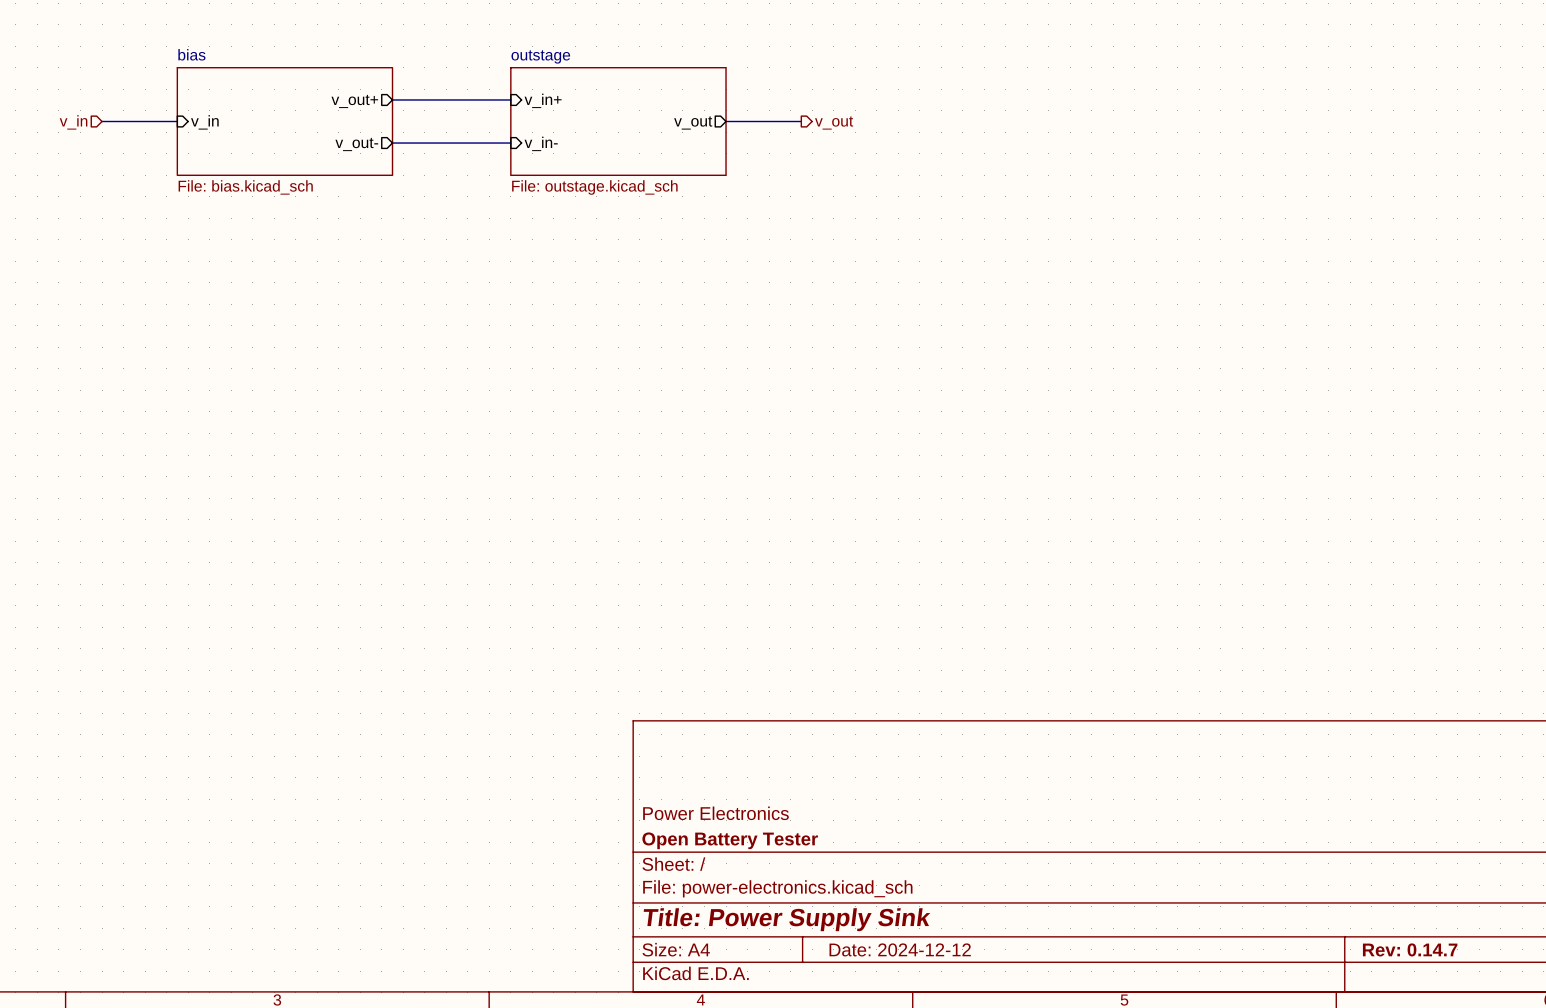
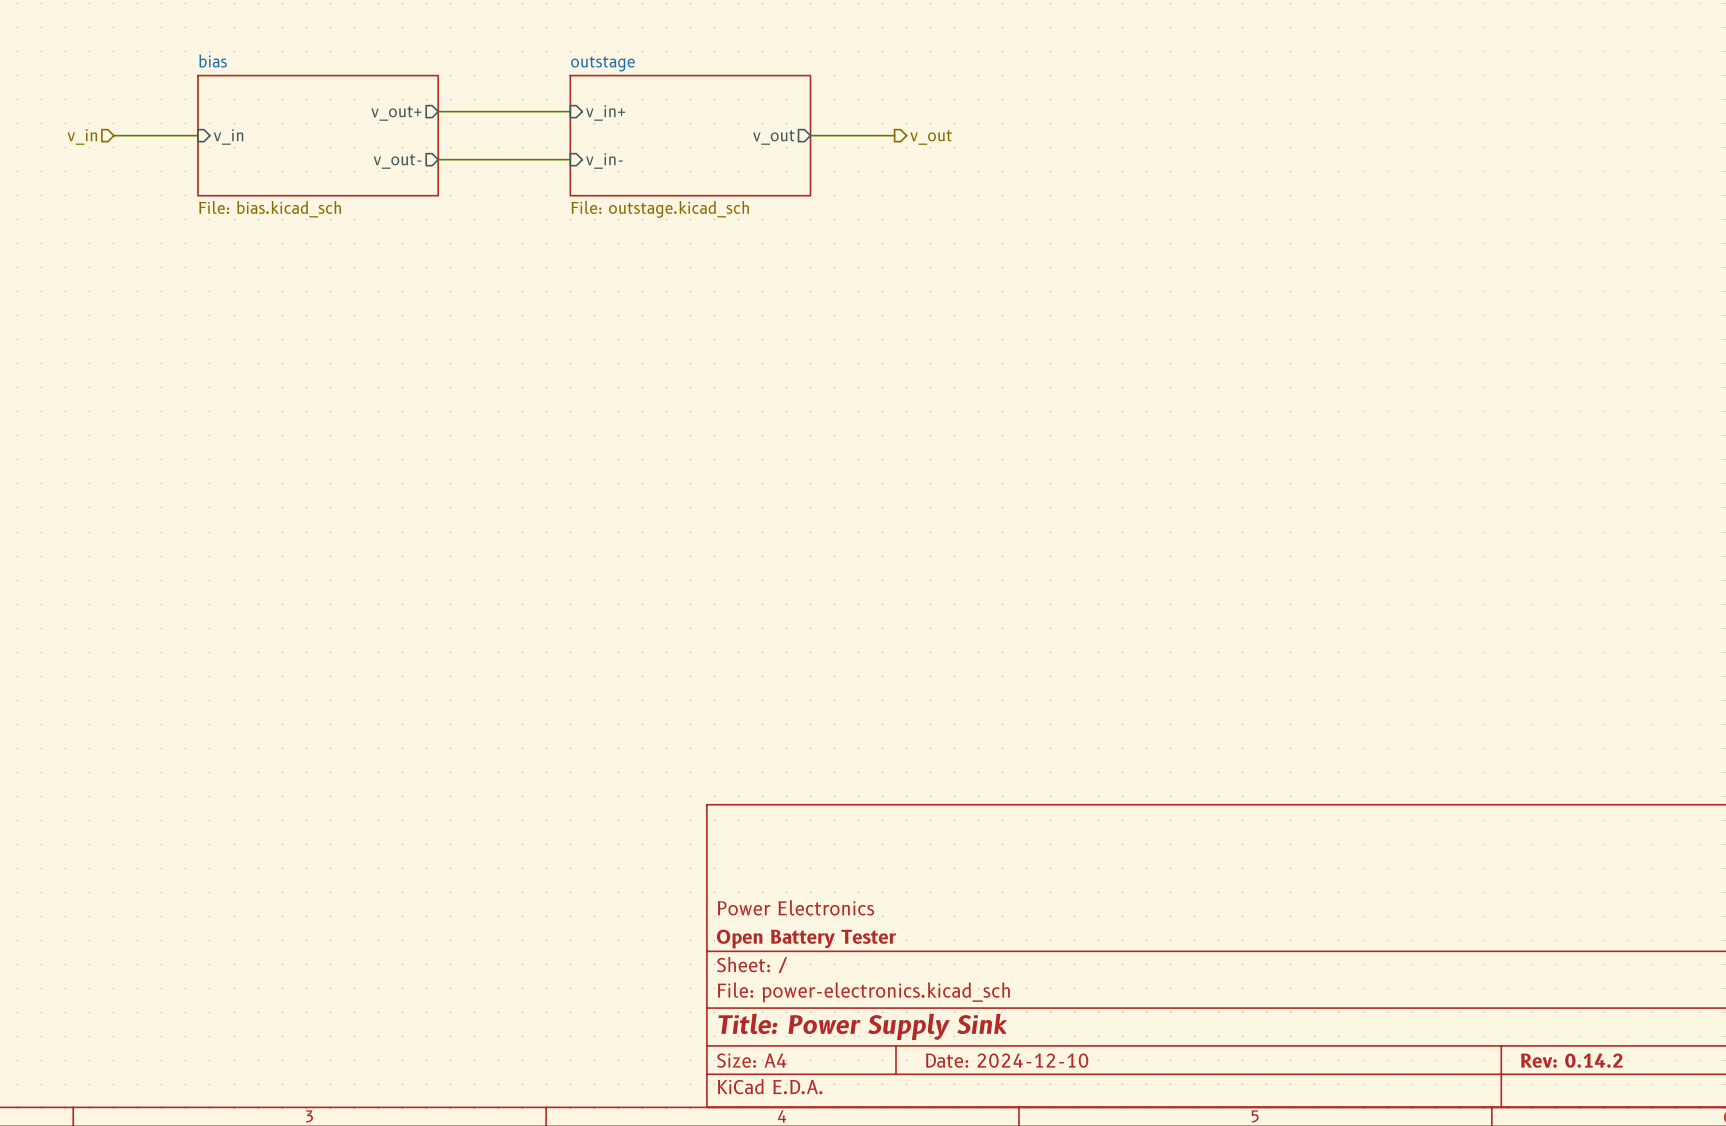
title block: Date: 2024-12-12 (900, 949) -> Date: 2024-12-10 (1007, 1060)
title block: Rev: 0.14.7 (1410, 949) -> Rev: 0.14.2 (1571, 1060)

